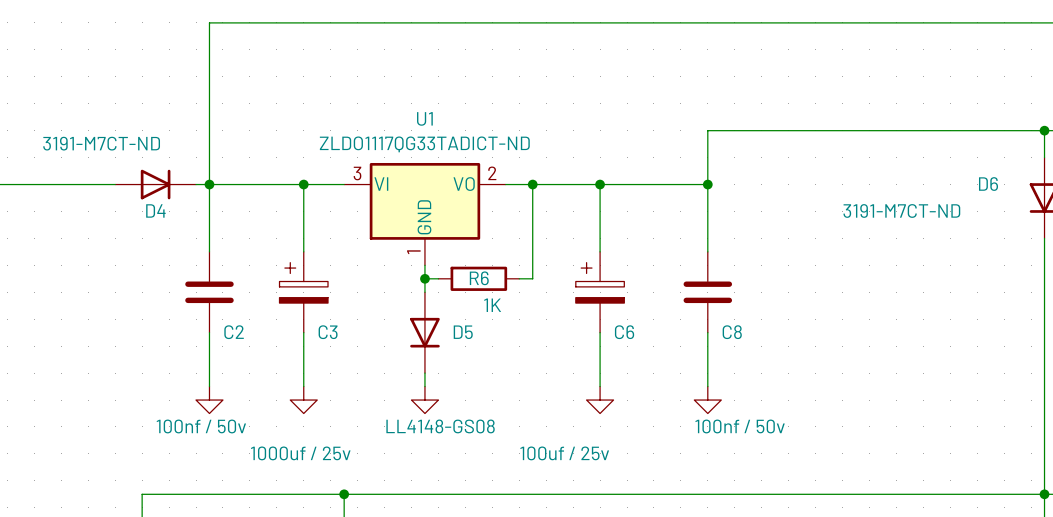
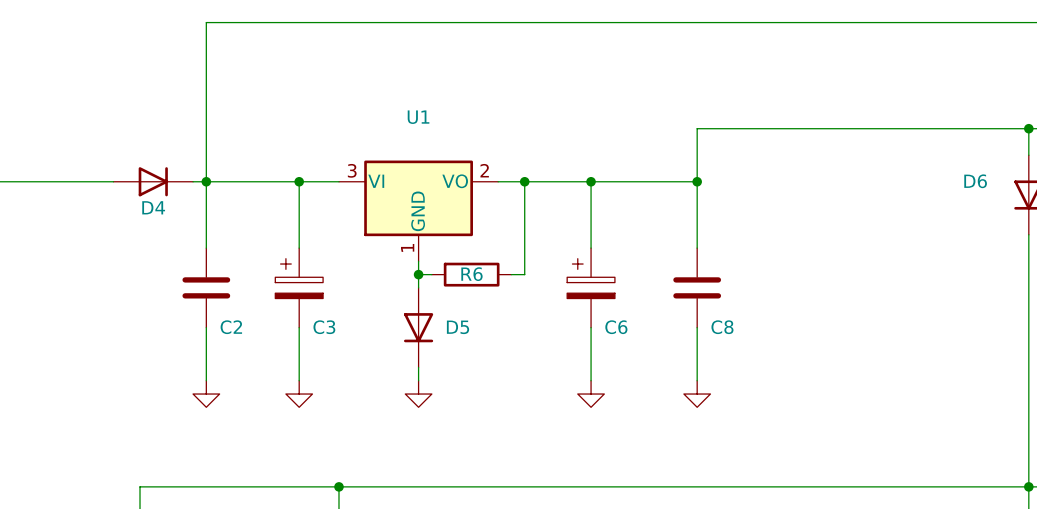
D4 value: 3191-M7CT-ND (101, 143) -> none
U1 value: ZLDO1117QG33TADICT-ND (424, 144) -> none
D6 value: 3191-M7CT-ND (901, 210) -> none
R6 value: 1K (492, 305) -> none
C2 value: 100nf / 50v (201, 426) -> none
D5 value: LL4148-GS08 (440, 426) -> none
C8 value: 100nf / 50v (740, 426) -> none
C3 value: 1000uf / 25v (300, 453) -> none
C6 value: 100uf / 25v (564, 453) -> none

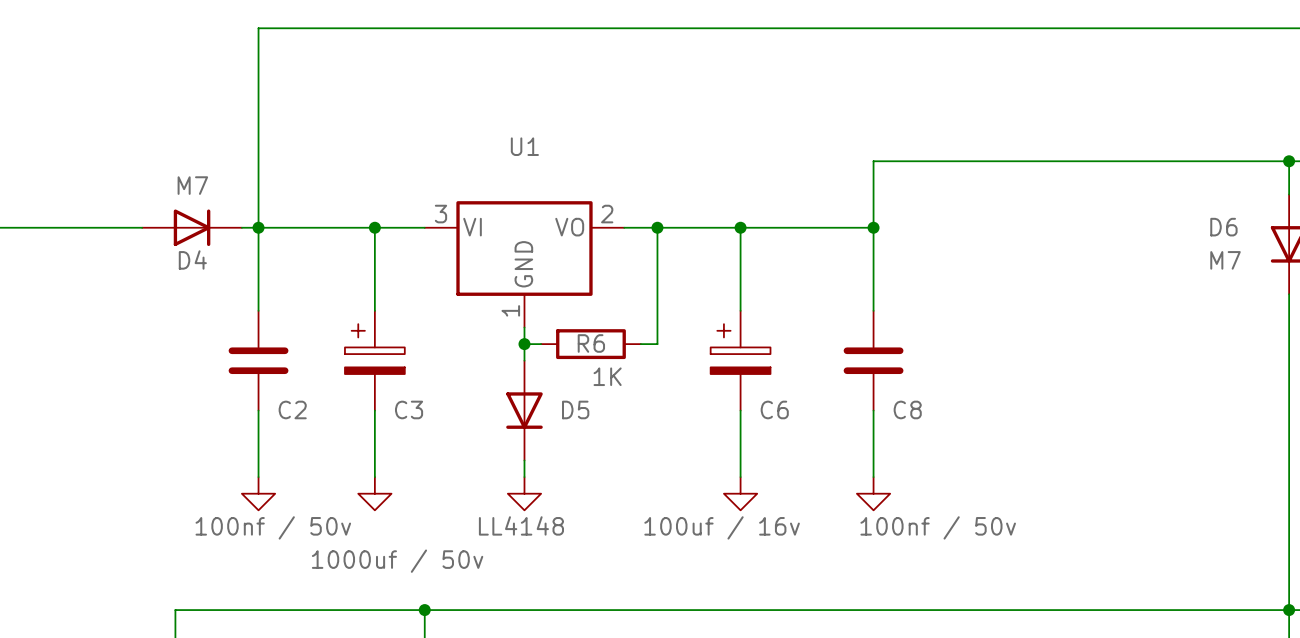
D4 value: none -> M7 (192, 185)
D6 value: none -> M7 (1225, 260)
R6 value: none -> 1K (607, 376)
C2 value: none -> 100nf / 50v (273, 527)
D5 value: none -> LL4148 (521, 525)
C6 value: none -> 100uf / 16v (722, 527)
C8 value: none -> 100nf / 50v (938, 527)
C3 value: none -> 1000uf / 50v (397, 561)

